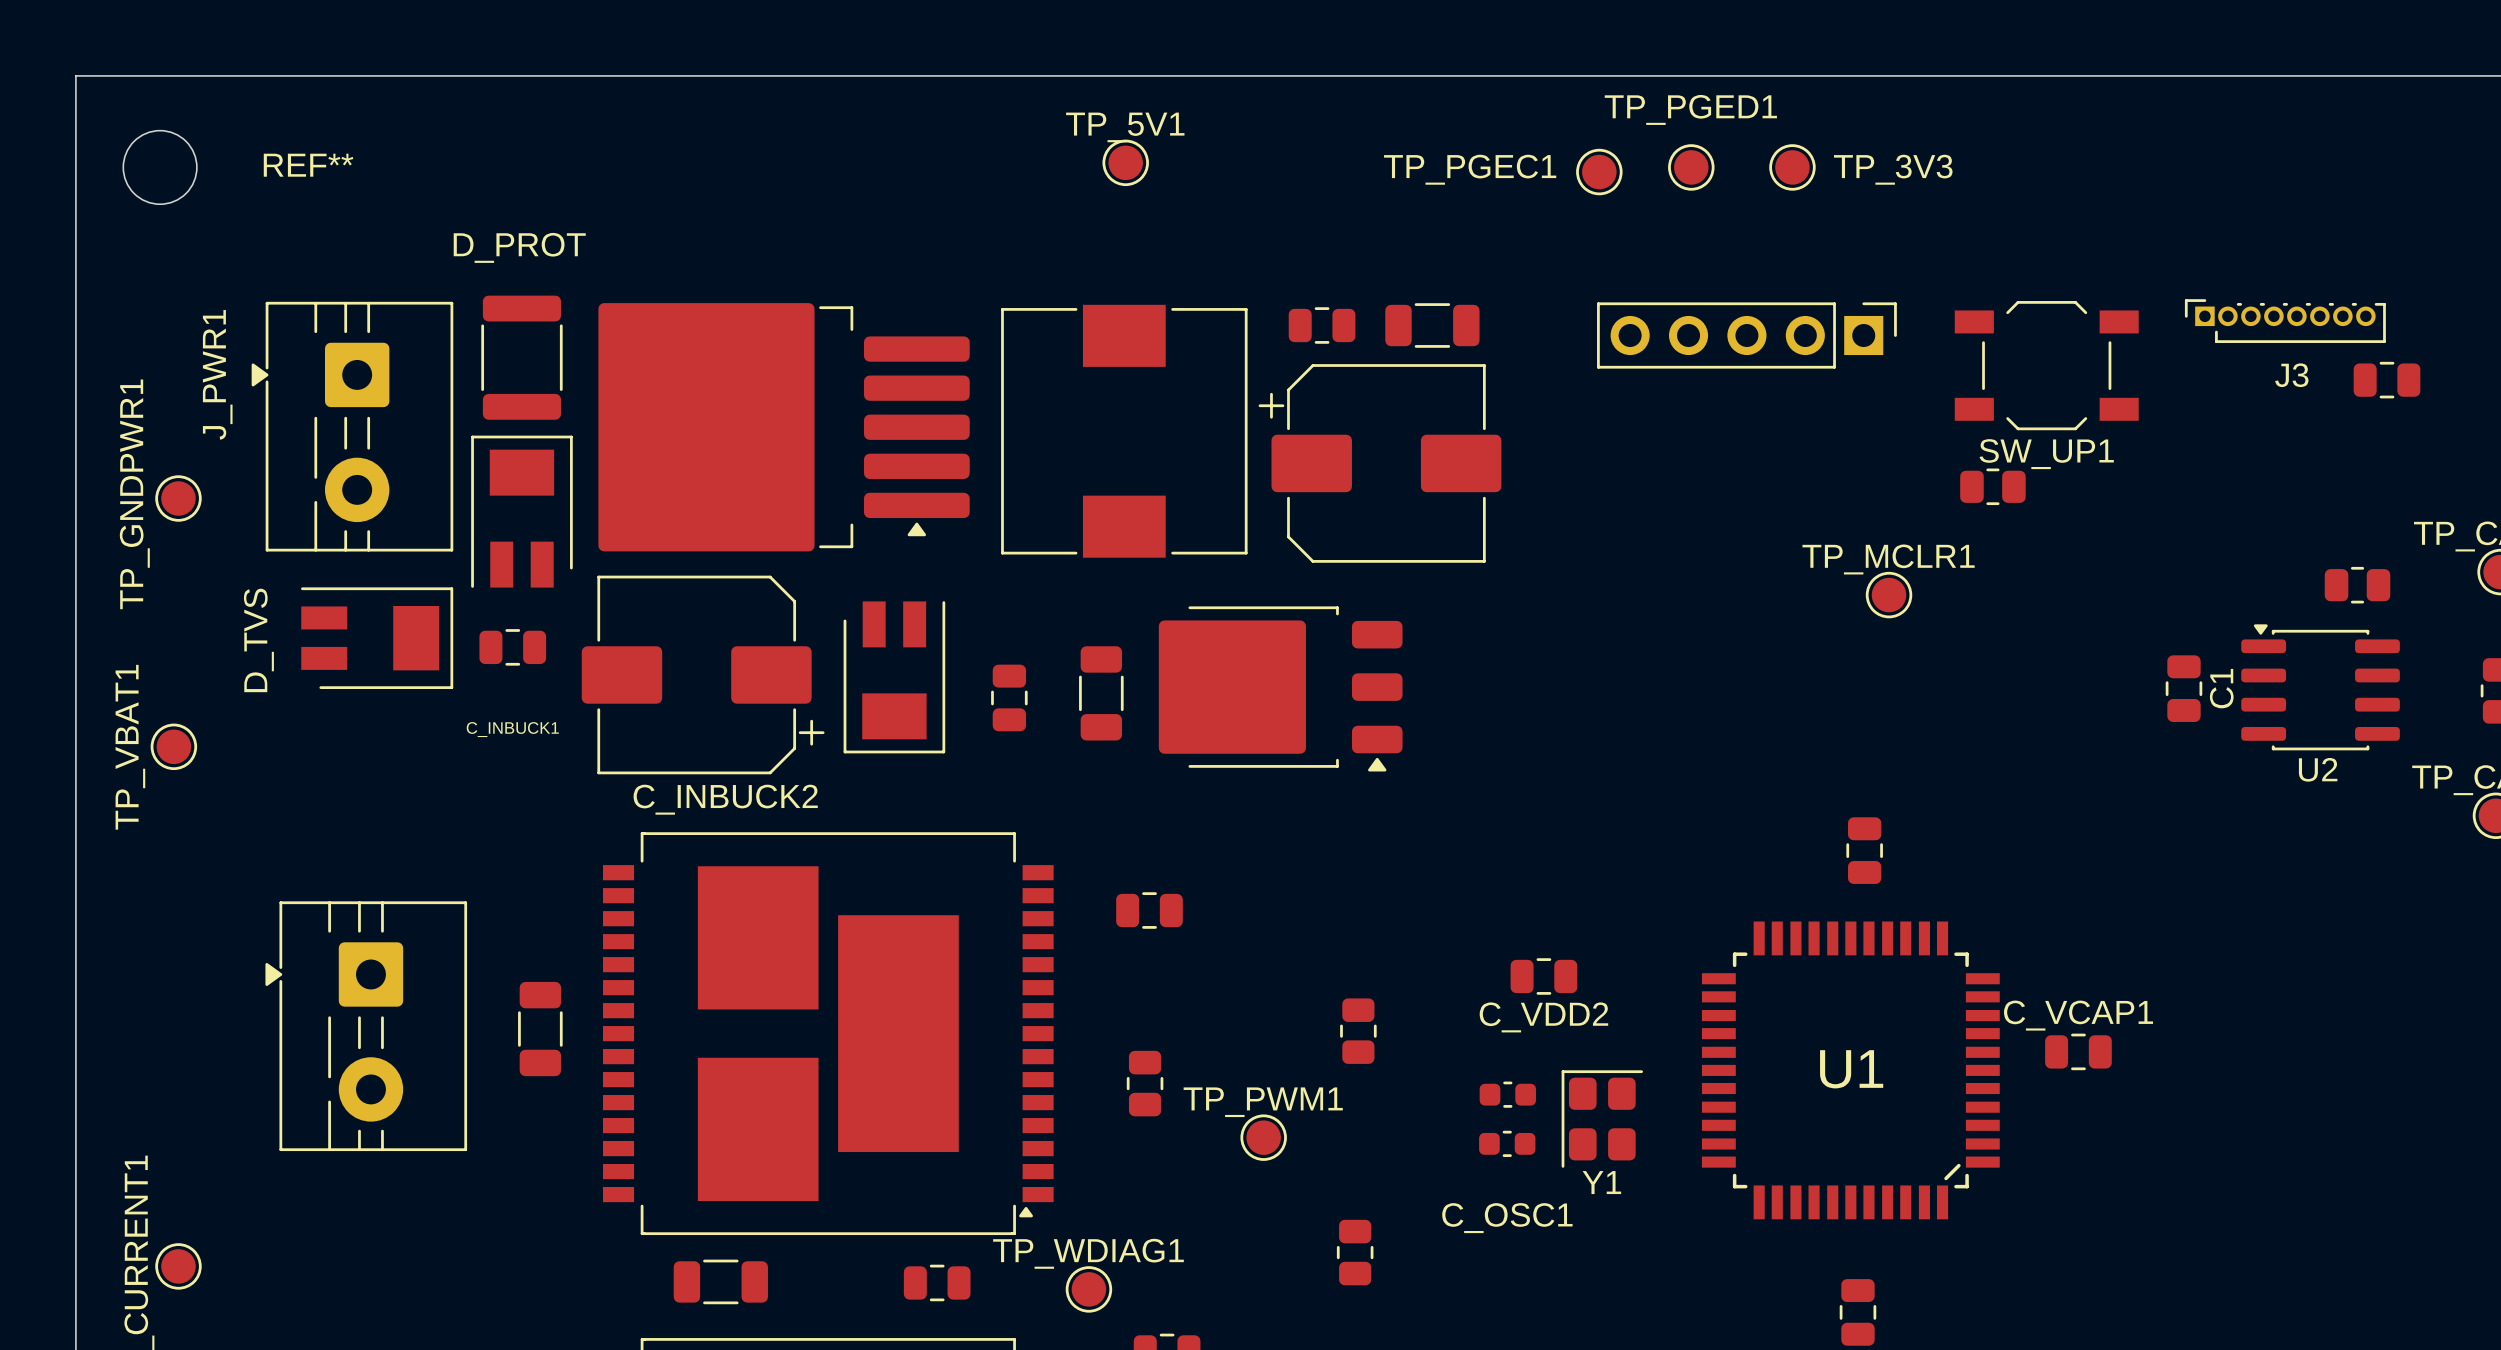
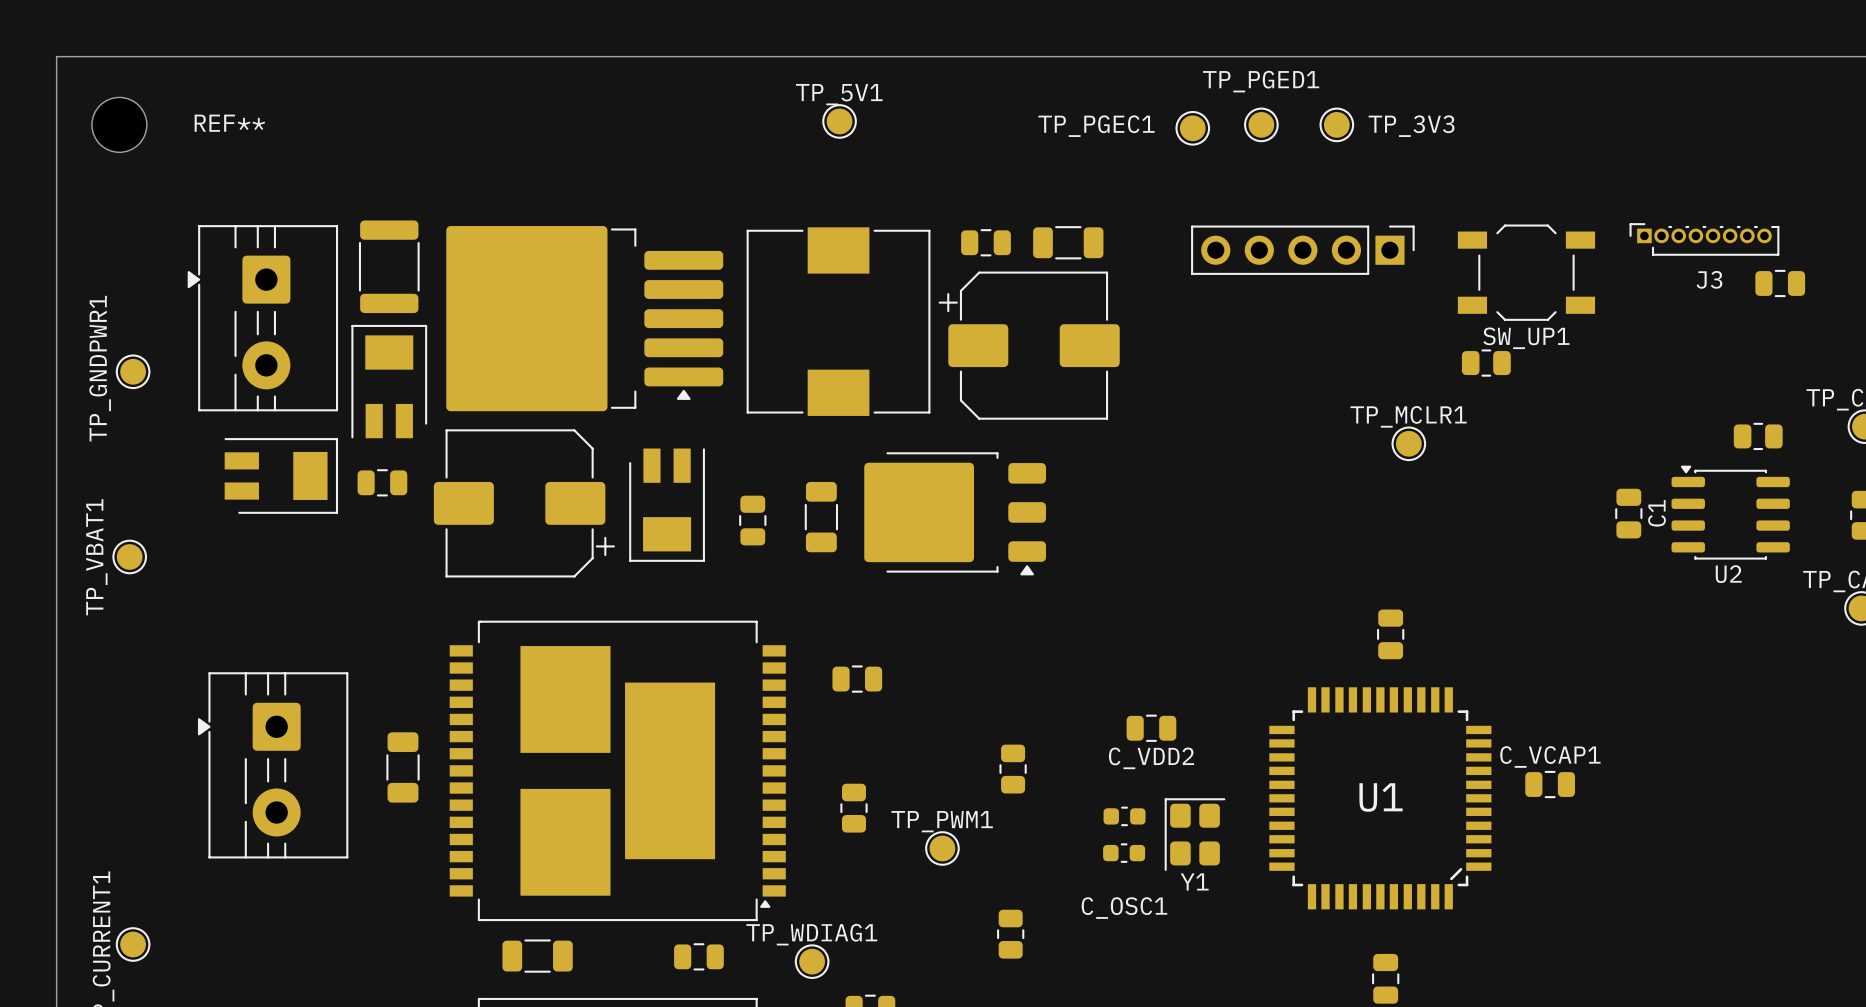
part text: D_PROT (519, 247) -> none
part text: J_PWR1 (217, 374) -> none
part text: D_TVS (258, 640) -> none
part text: C_INBUCK1 (512, 729) -> none
part text: C_INBUCK2 (725, 799) -> none

